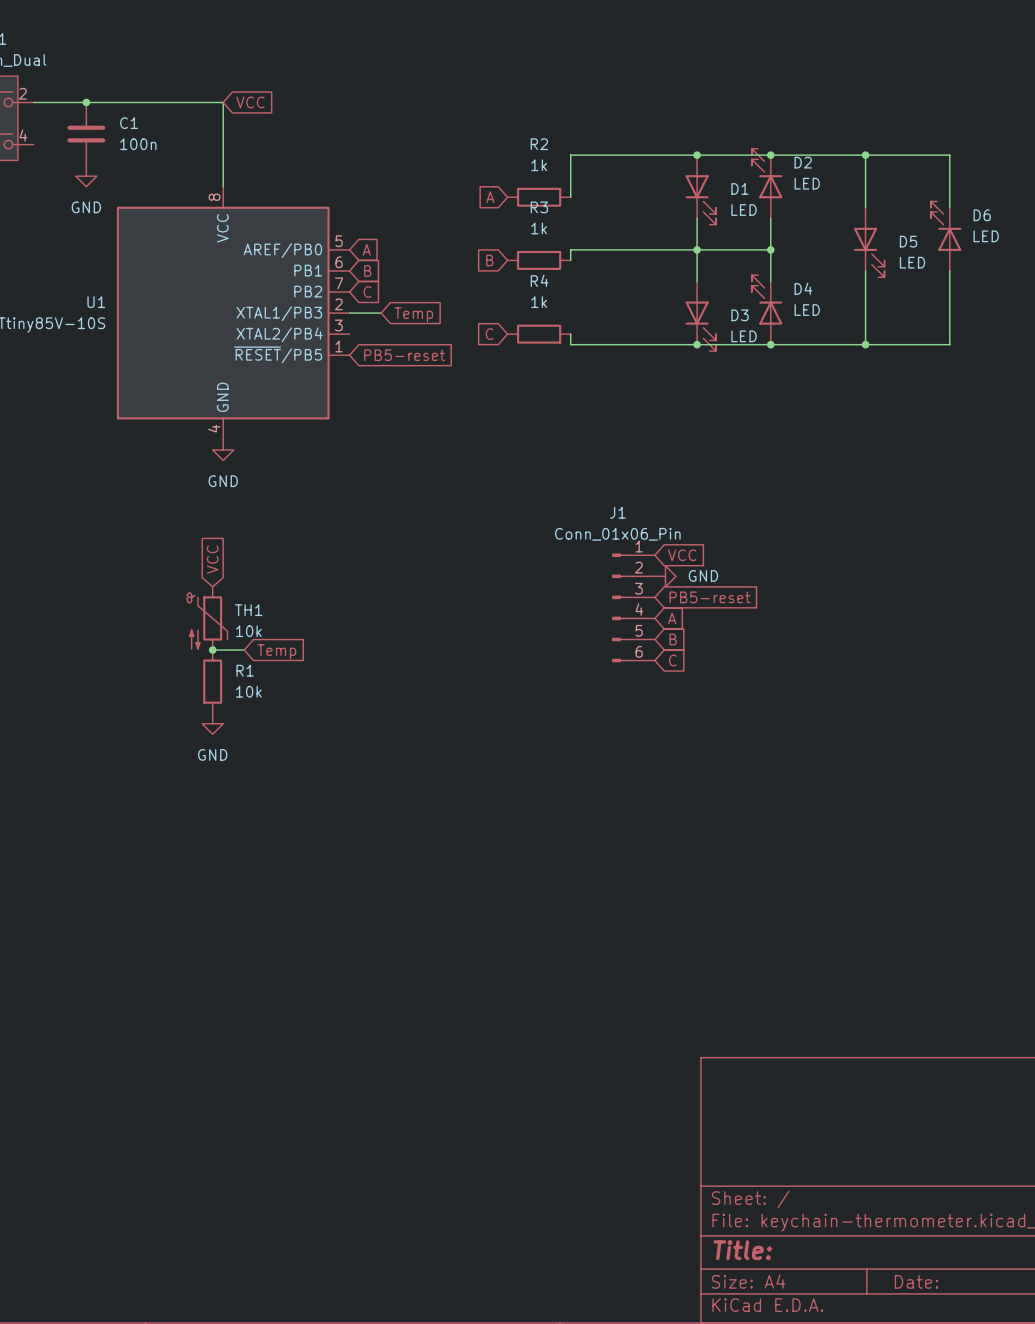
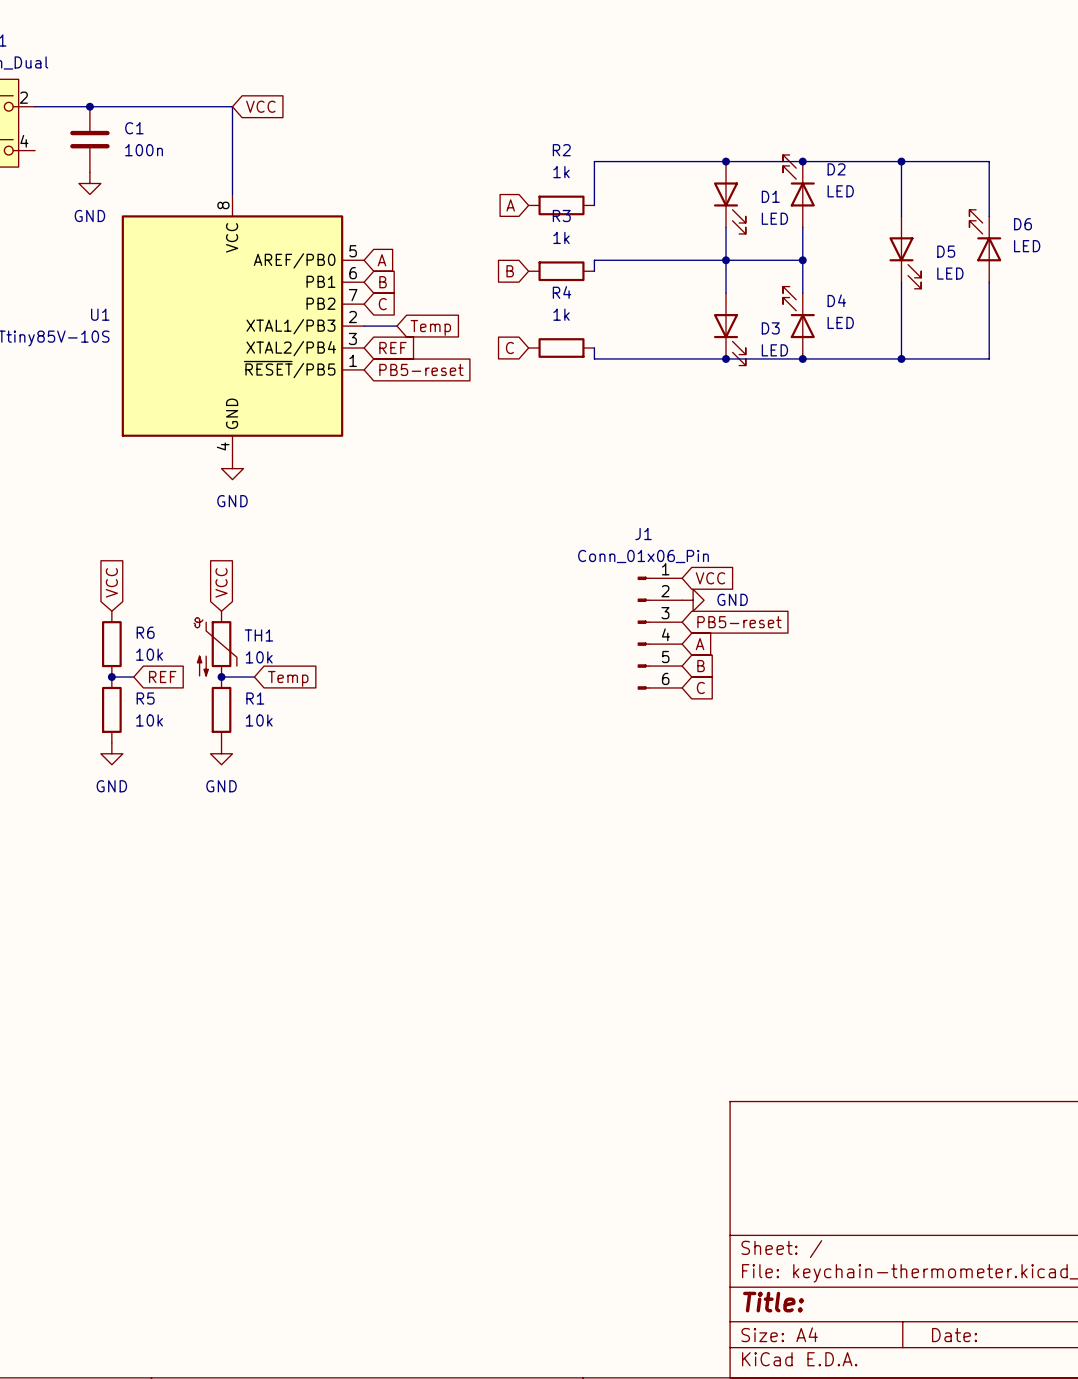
global label: none -> REF (392, 348)
global label: none -> VCC (111, 582)
R6: none -> 10k (111, 644)
wire: none -> (111, 677) (133, 677)
junction: none -> (111, 677)
global label: none -> REF (162, 677)
R5: none -> 10k (111, 709)
power symbol: none -> GND (111, 753)

